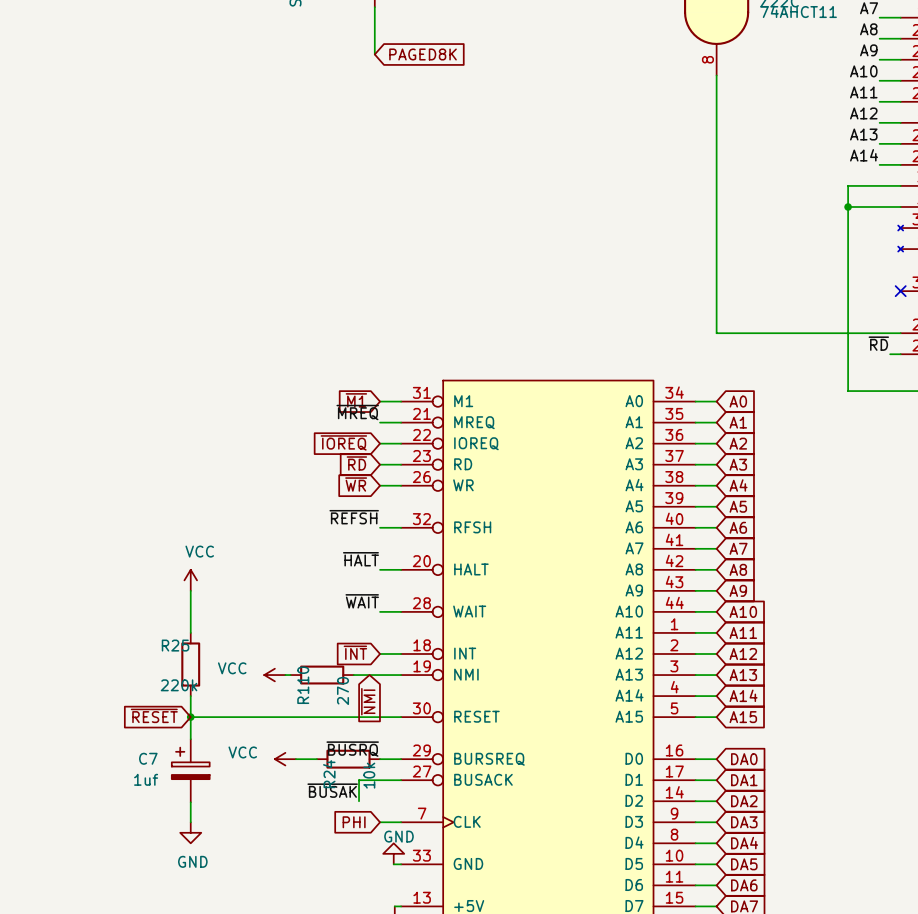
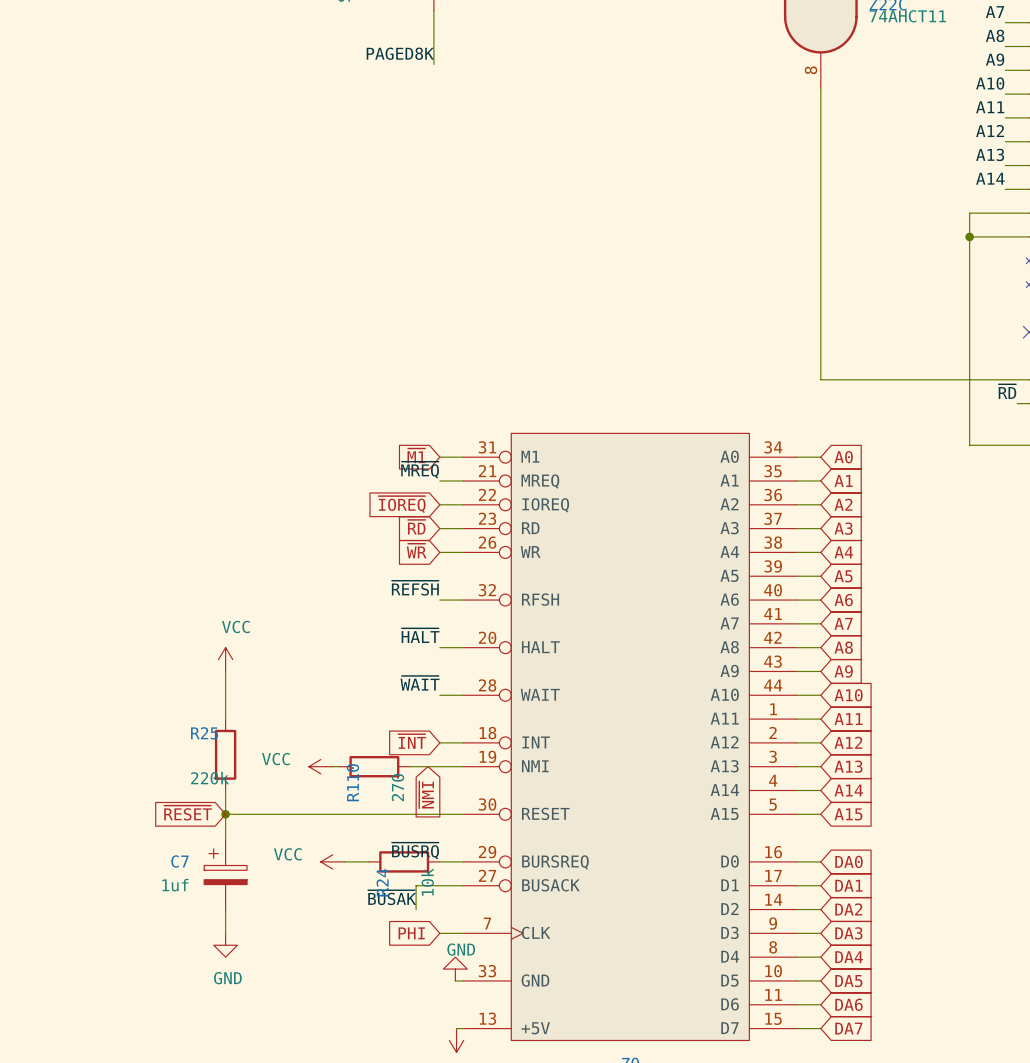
label: none -> PAGED8K (400, 53)
global label: PAGED8K (423, 54) -> none

